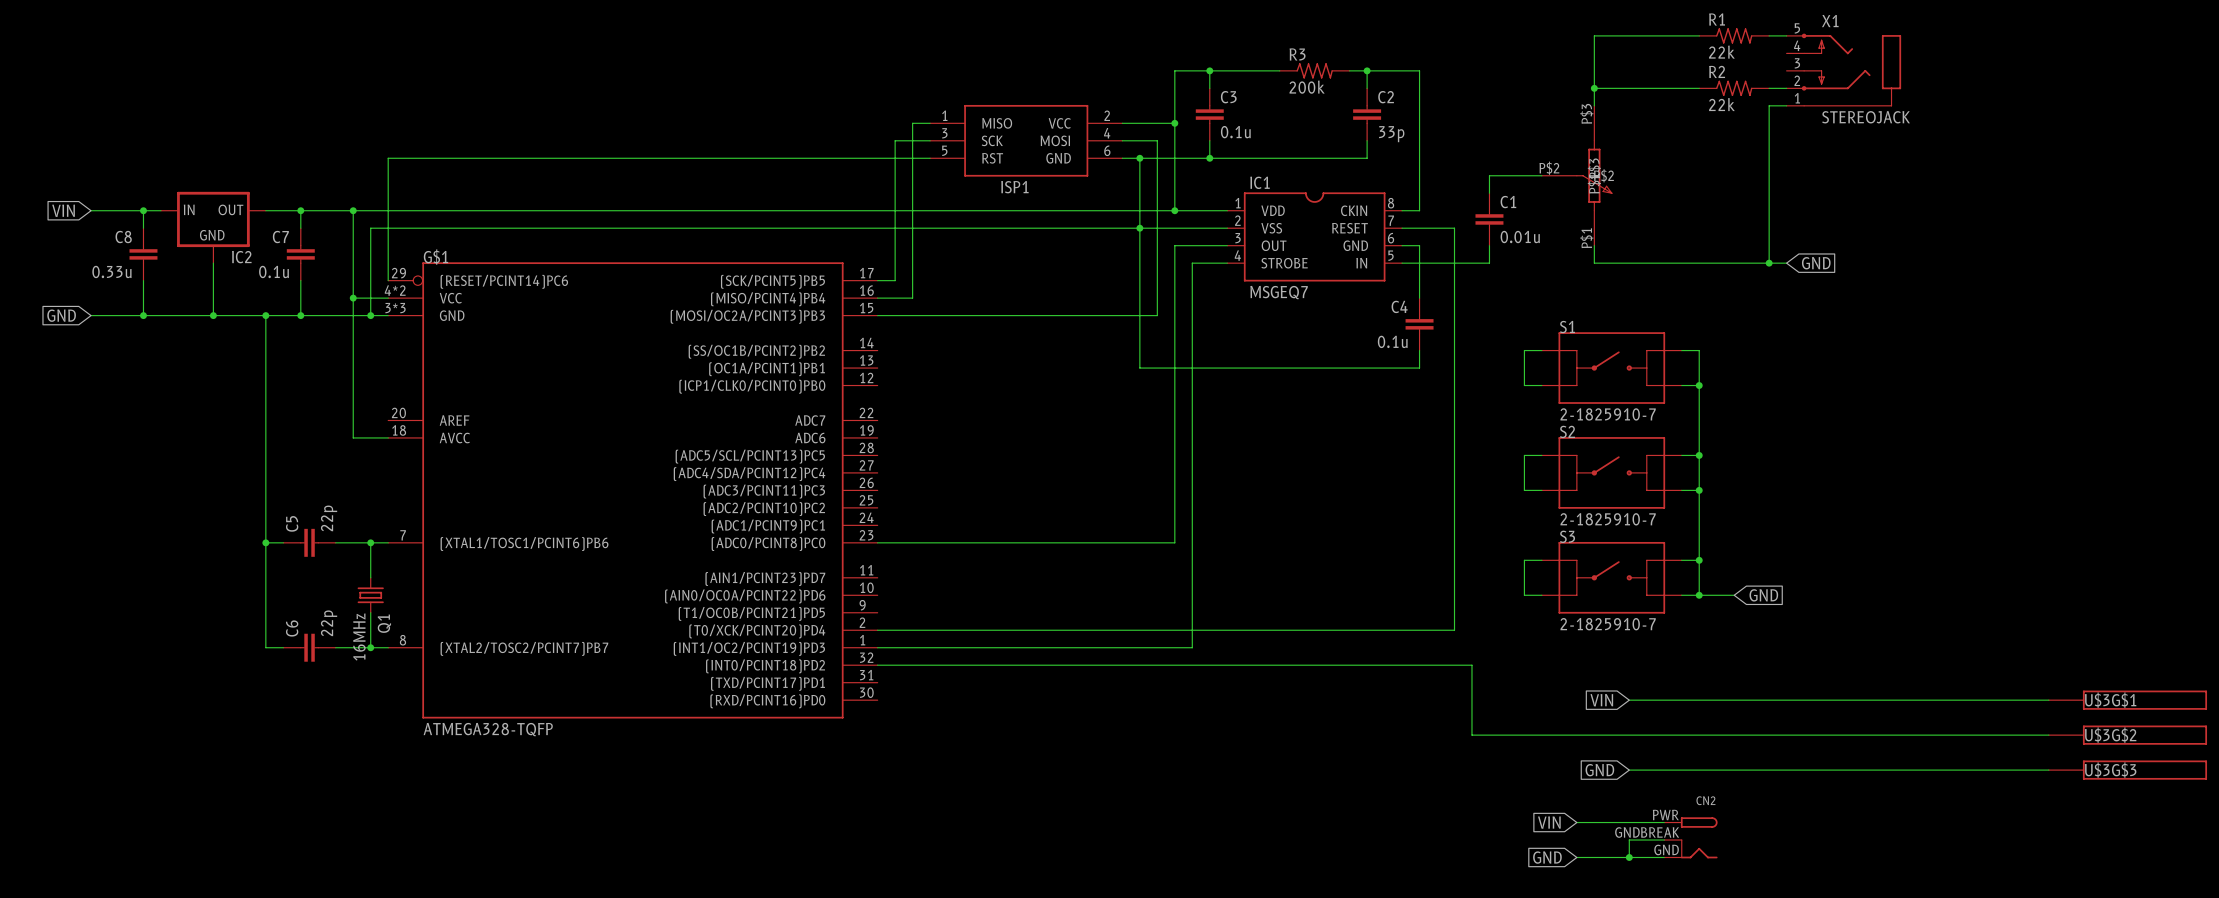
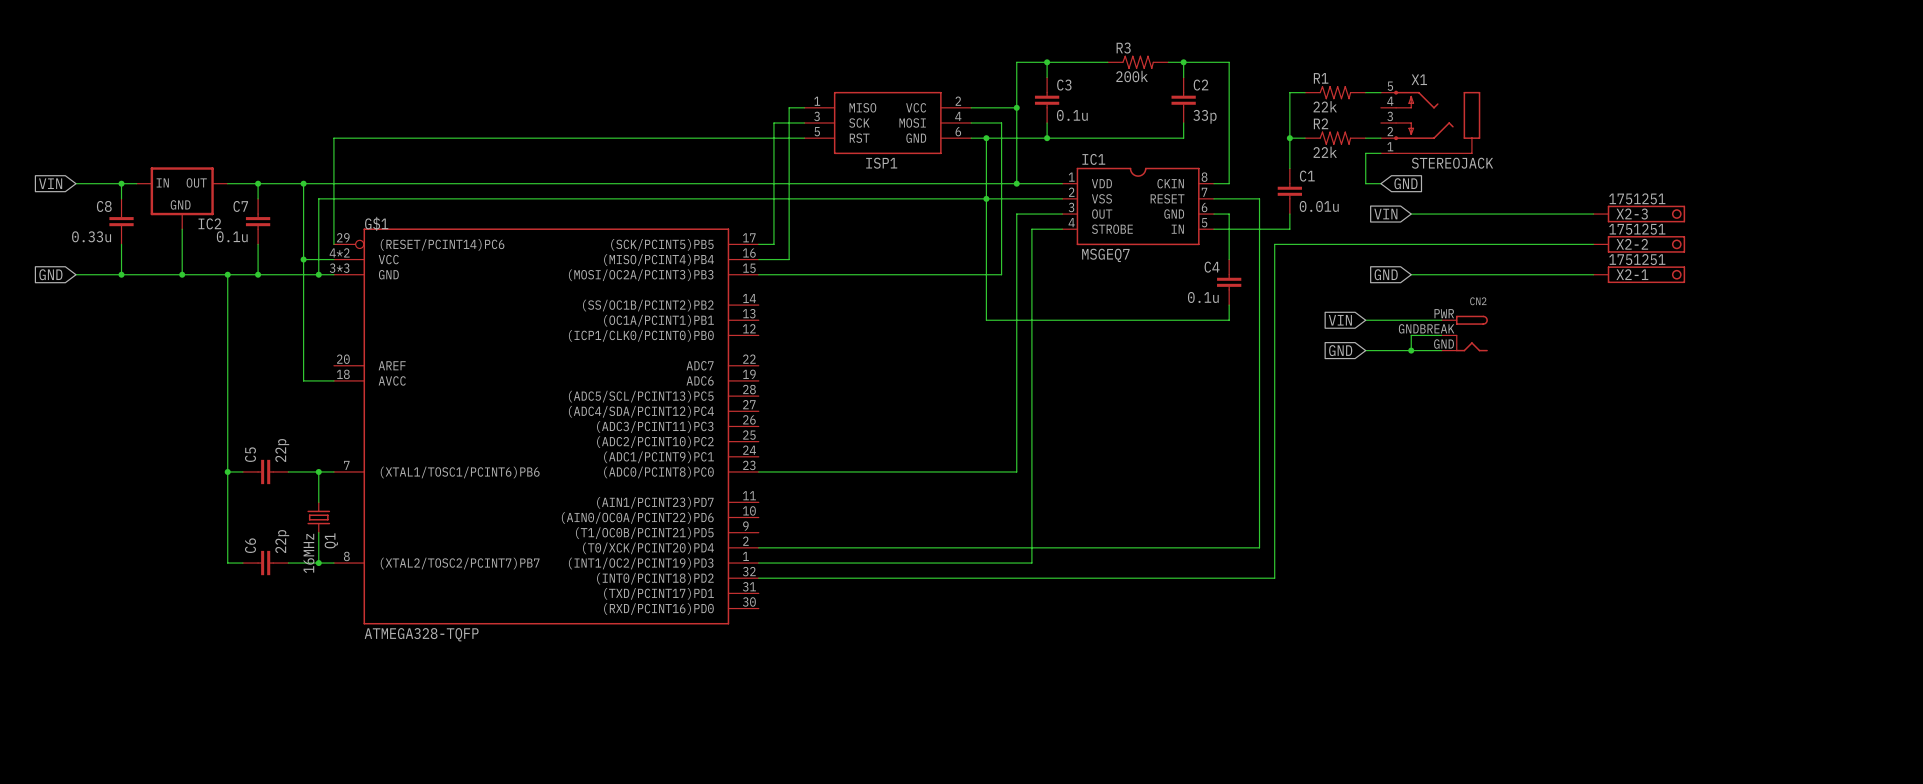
wire: (1699, 35) (1594, 35) (1594, 105) -> (1365, 92) (1380, 92)
R1 position: (1734, 35) -> (1335, 92)
wire: (1769, 35) (1786, 35) -> none
X1 position: (1843, 70) -> (1430, 122)
wire: (1594, 88) (1699, 88) -> none
junction: (1594, 88) -> none
R2 position: (1734, 88) -> (1335, 138)
wire: (1769, 88) (1786, 88) -> none
wire: (1786, 105) (1769, 105) (1769, 263) -> none
wire: none -> (1289, 138) (1305, 138)
junction: none -> (1289, 138)
wire: none -> (1365, 138) (1380, 138)
wire: (1489, 175) (1541, 175) -> (1289, 153) (1289, 92) (1305, 92)
part: (1577, 175) -> none
wire: none -> (1380, 153) (1365, 153) (1365, 183) (1380, 183)
global label: none -> GND (1405, 183)
wire: (1594, 245) (1594, 263) (1786, 263) -> none
global label: none -> VIN (1385, 214)
wire: none -> (1411, 214) (1593, 214)
X2-3: none -> 1751251 (1639, 214)
junction: (1769, 263) -> none
global label: GND (1816, 263) -> none
X2-2: none -> 1751251 (1639, 244)
global label: none -> GND (1386, 274)
wire: none -> (1411, 274) (1593, 274)
X2-1: none -> 1751251 (1639, 274)
wire: (1541, 350) (1524, 350) (1524, 385) (1541, 385) -> none
wire: (1681, 350) (1699, 350) (1699, 595) -> none
global label: none -> VIN (1340, 320)
wire: none -> (1365, 320) (1441, 320)
S1: 2-1825910-7 (1611, 368) -> none
wire: none -> (1441, 335) (1411, 335) (1411, 350)
wire: (1681, 385) (1699, 385) -> none
junction: (1699, 385) -> none
global label: none -> GND (1340, 350)
junction: none -> (1411, 350)
wire: (1541, 455) (1524, 455) (1524, 490) (1541, 490) -> none
wire: (1681, 455) (1699, 455) -> none
junction: (1699, 455) -> none
S2: 2-1825910-7 (1611, 472) -> none
wire: (1681, 490) (1699, 490) -> none
junction: (1699, 490) -> none
wire: (1541, 560) (1524, 560) (1524, 595) (1541, 595) -> none
wire: (1681, 560) (1699, 560) -> none
junction: (1699, 560) -> none
S3: 2-1825910-7 (1611, 577) -> none
wire: (1681, 595) (1734, 595) -> none
junction: (1699, 595) -> none
global label: GND (1763, 595) -> none
wire: (1471, 665) (1471, 735) (2048, 735) -> (1274, 578) (1274, 244) (1593, 244)
global label: VIN (1601, 700) -> none
wire: (1629, 700) (2048, 700) -> none
U$3G$1: (2127, 700) -> none
U$3G$2: (2127, 735) -> none
global label: GND (1599, 770) -> none
wire: (1629, 770) (2048, 770) -> none
U$3G$3: (2127, 770) -> none
global label: VIN (1549, 822) -> none
wire: (1576, 822) (1664, 822) -> none
CN2 position: (1690, 837) -> (1464, 333)
wire: (1664, 840) (1629, 840) (1629, 857) -> none
global label: GND (1547, 857) -> none
wire: (1576, 857) (1664, 857) -> none
junction: (1629, 857) -> none

